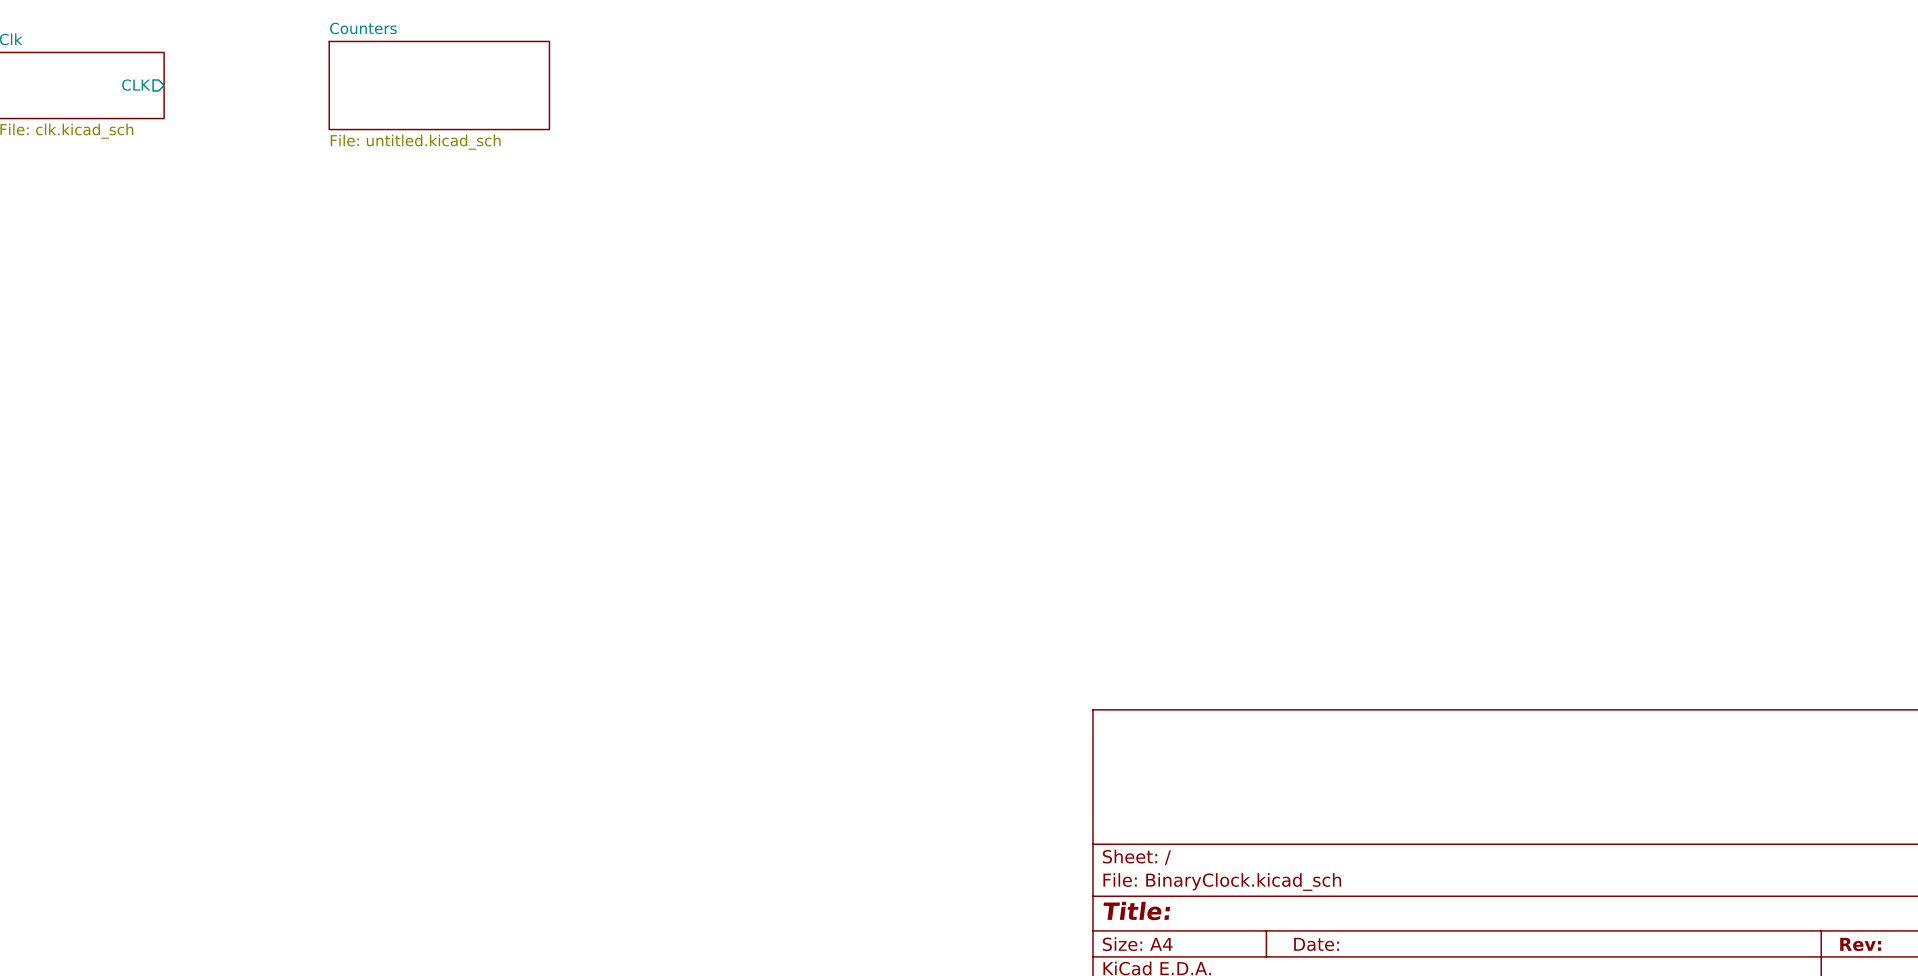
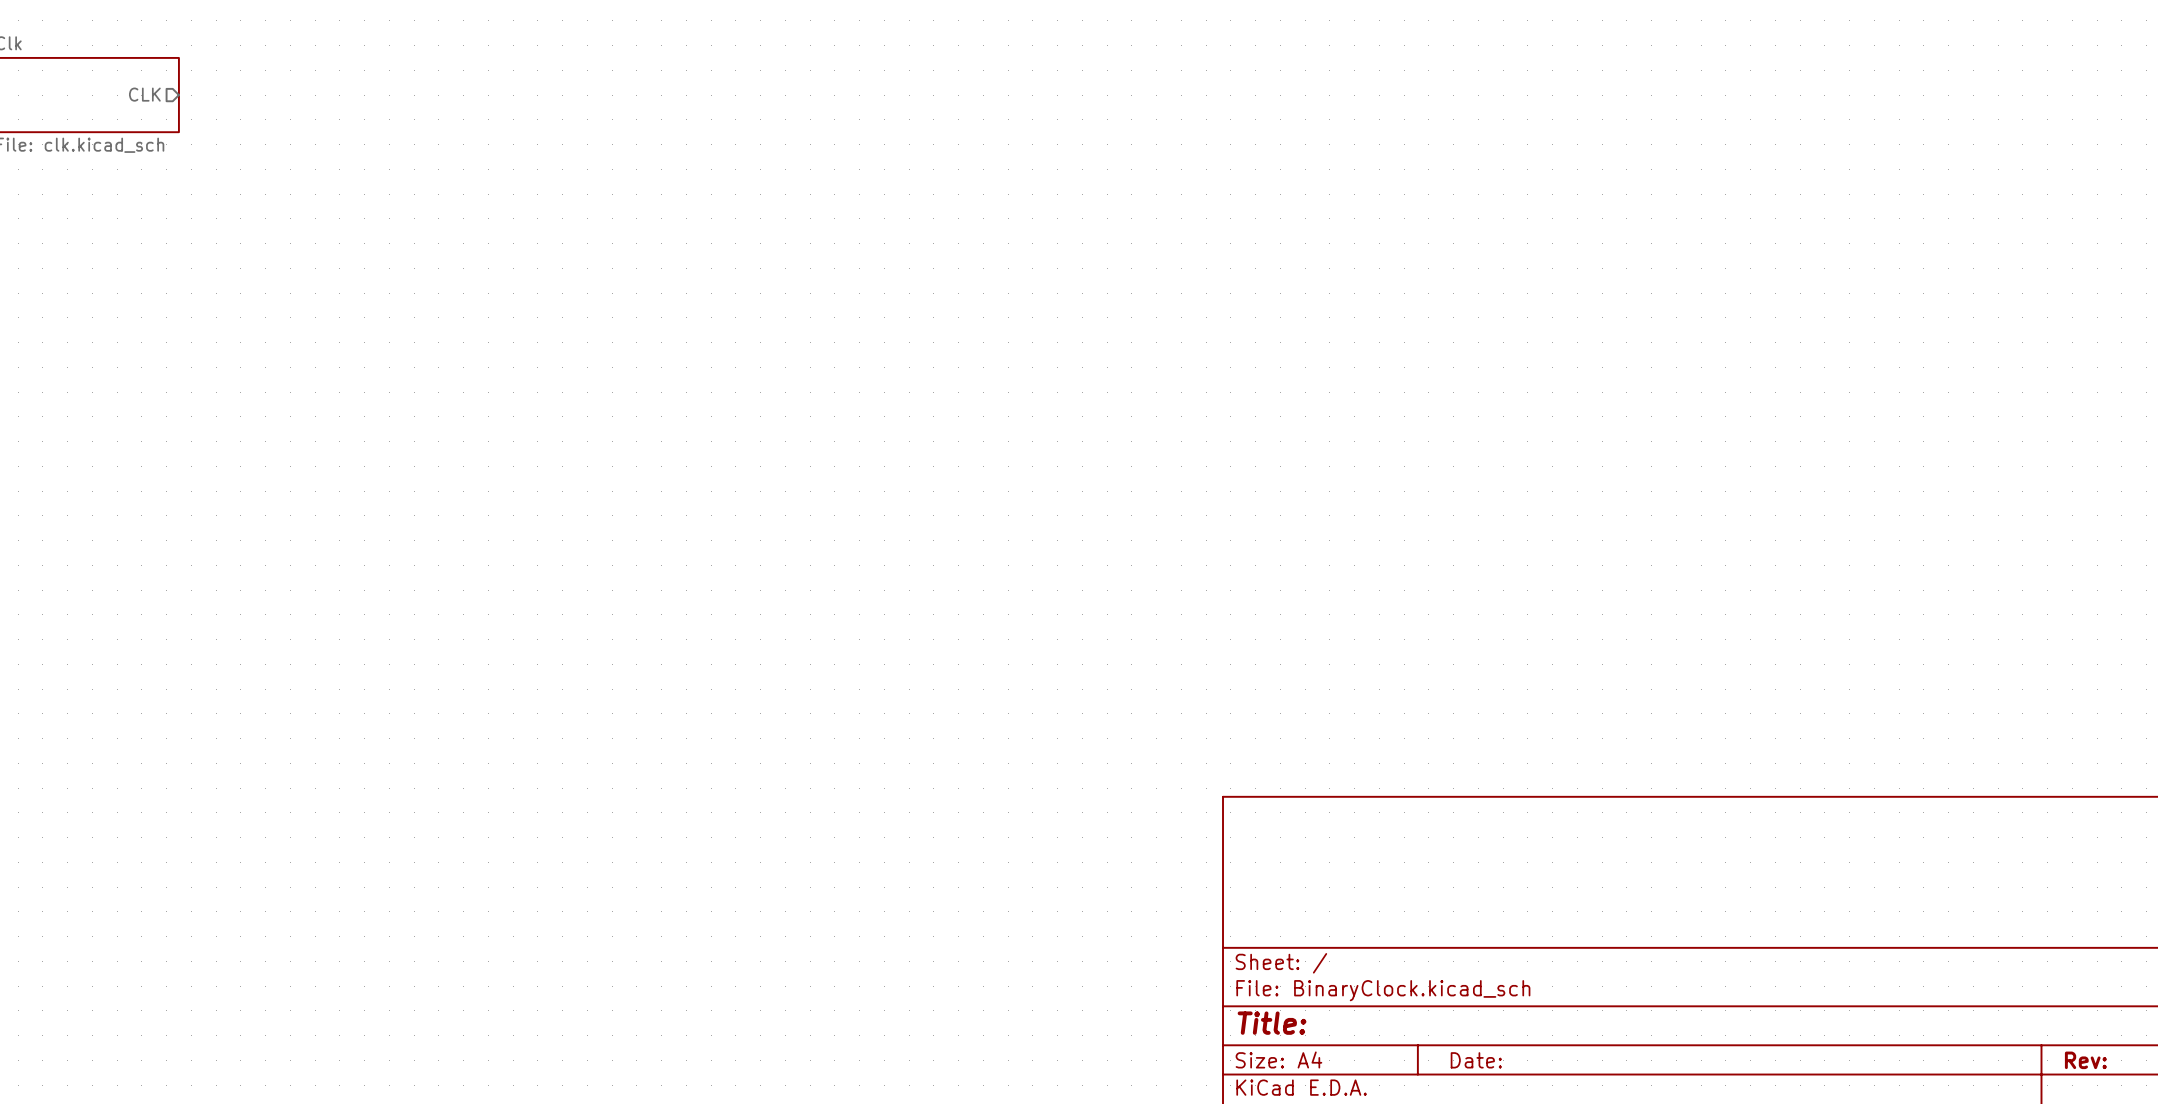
sheet Counters: File: untitled.kicad_sch (439, 85) -> none

